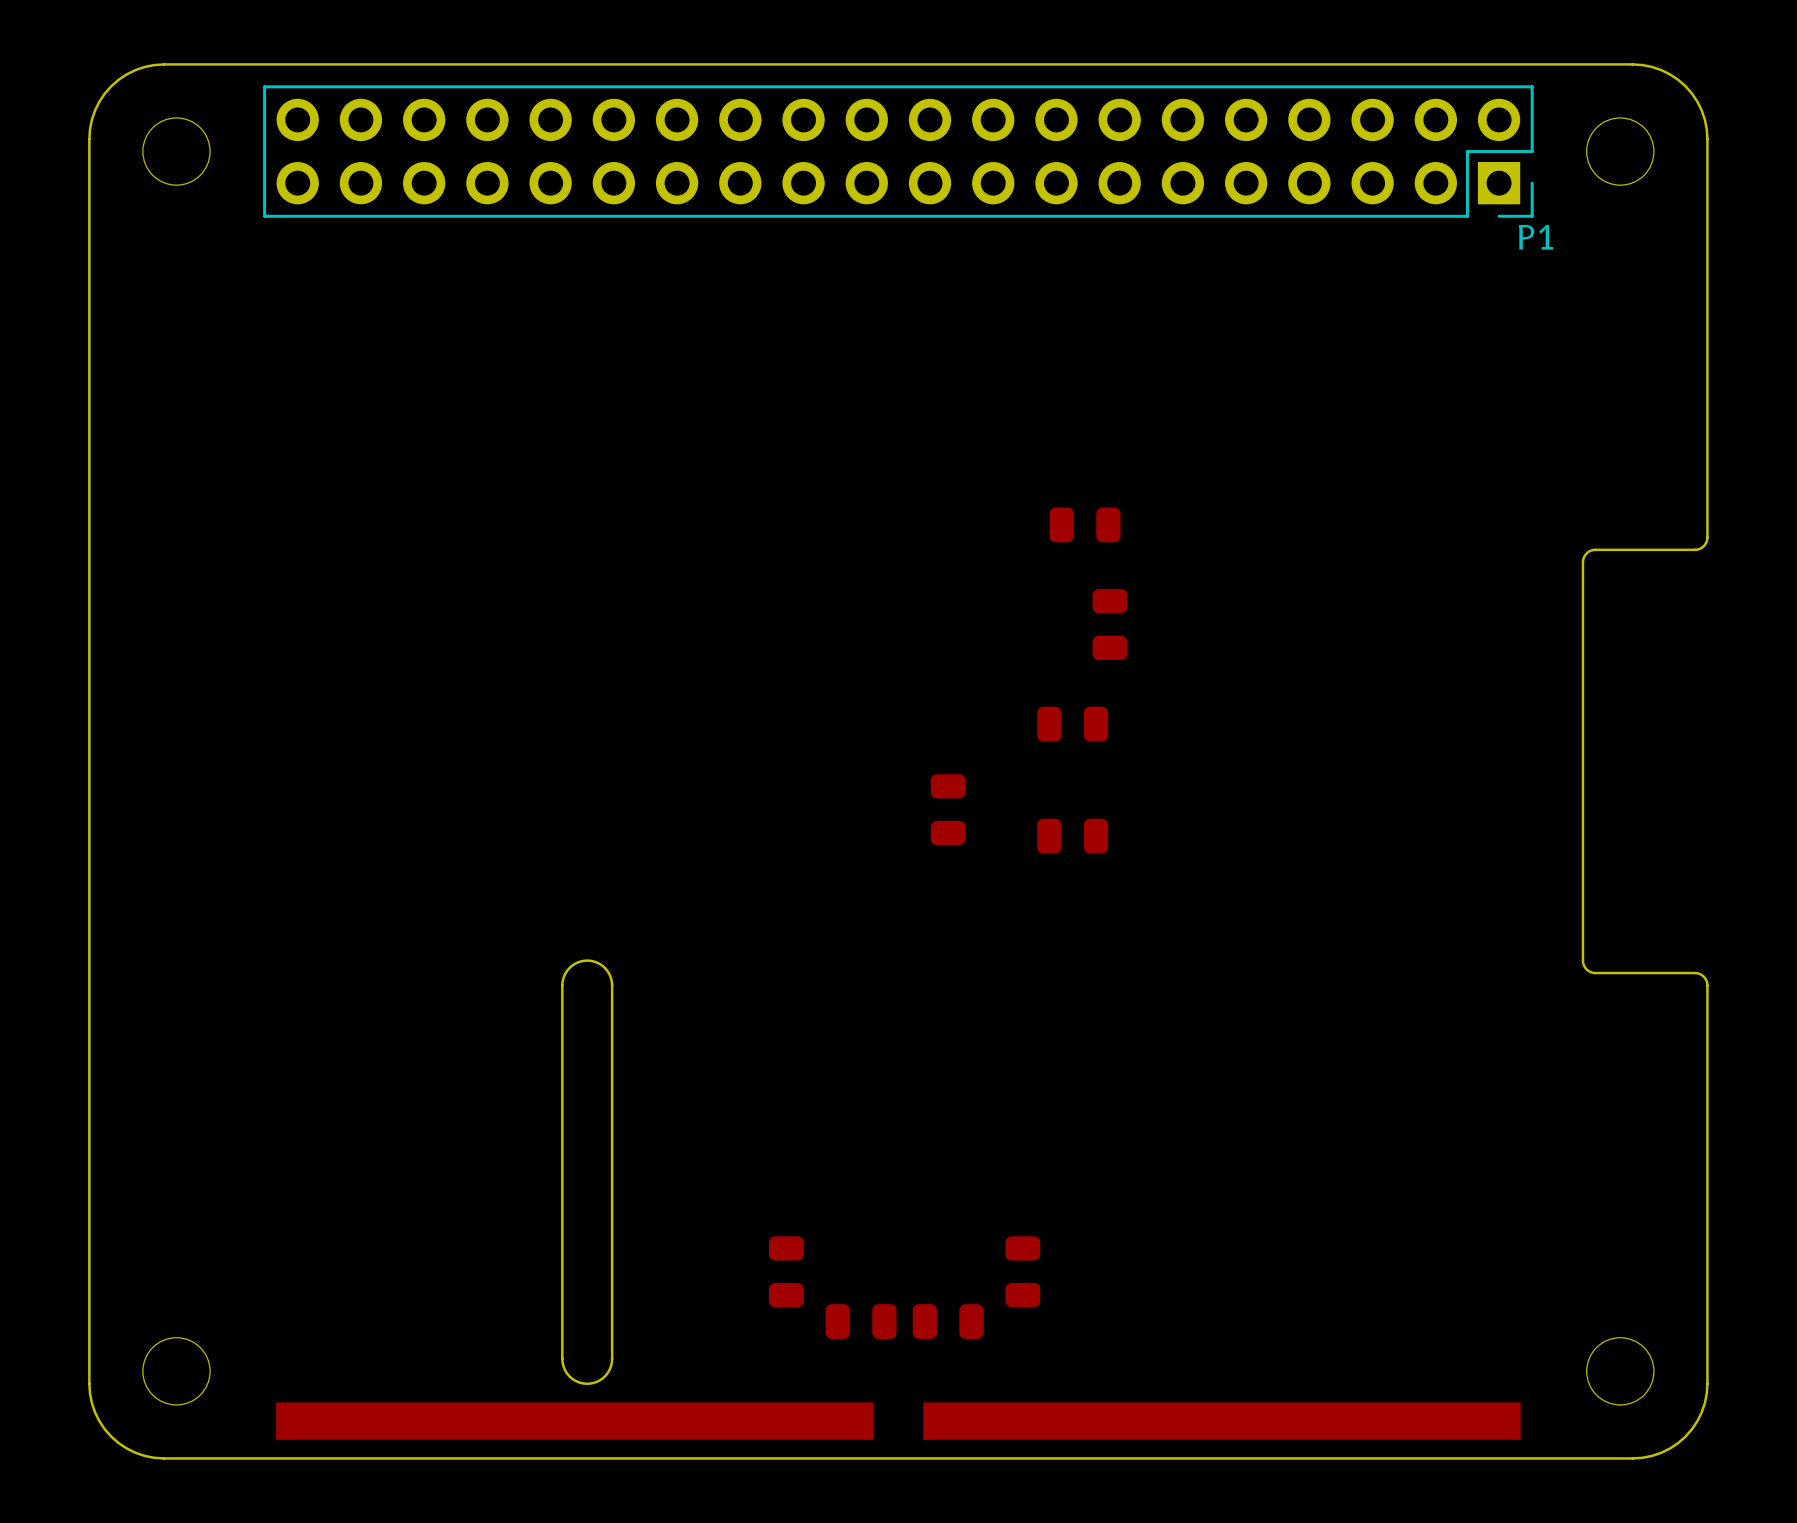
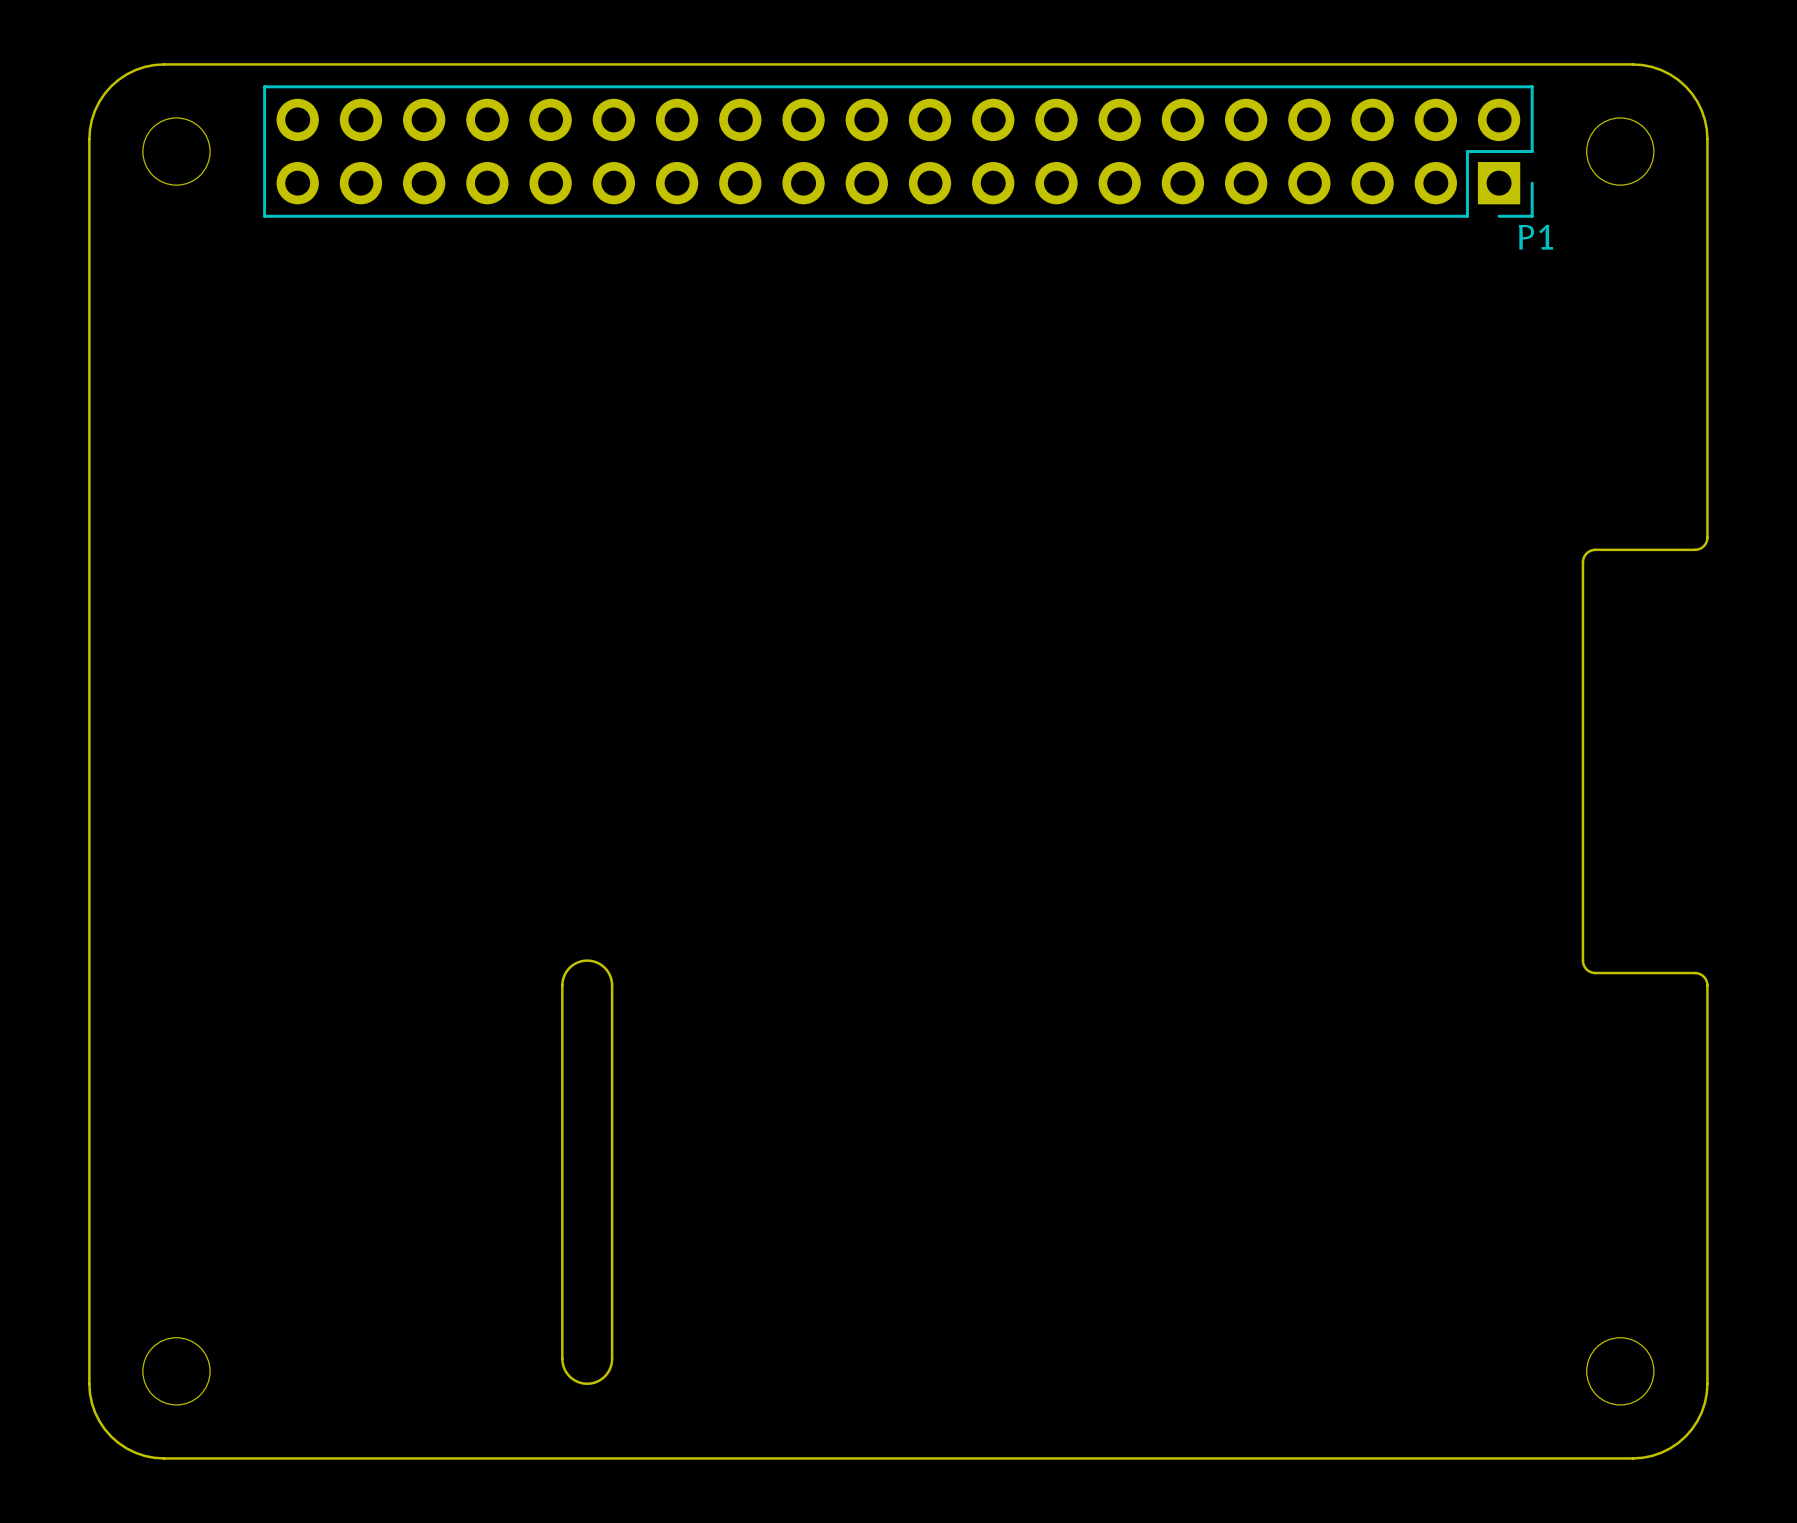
part: (1085, 524) -> none
part: (1109, 624) -> none
part: (1072, 724) -> none
part: (948, 809) -> none
part: (1072, 836) -> none
part: (786, 1271) -> none
part: (1022, 1271) -> none
part: (861, 1321) -> none
part: (948, 1321) -> none
part: (898, 1421) -> none

